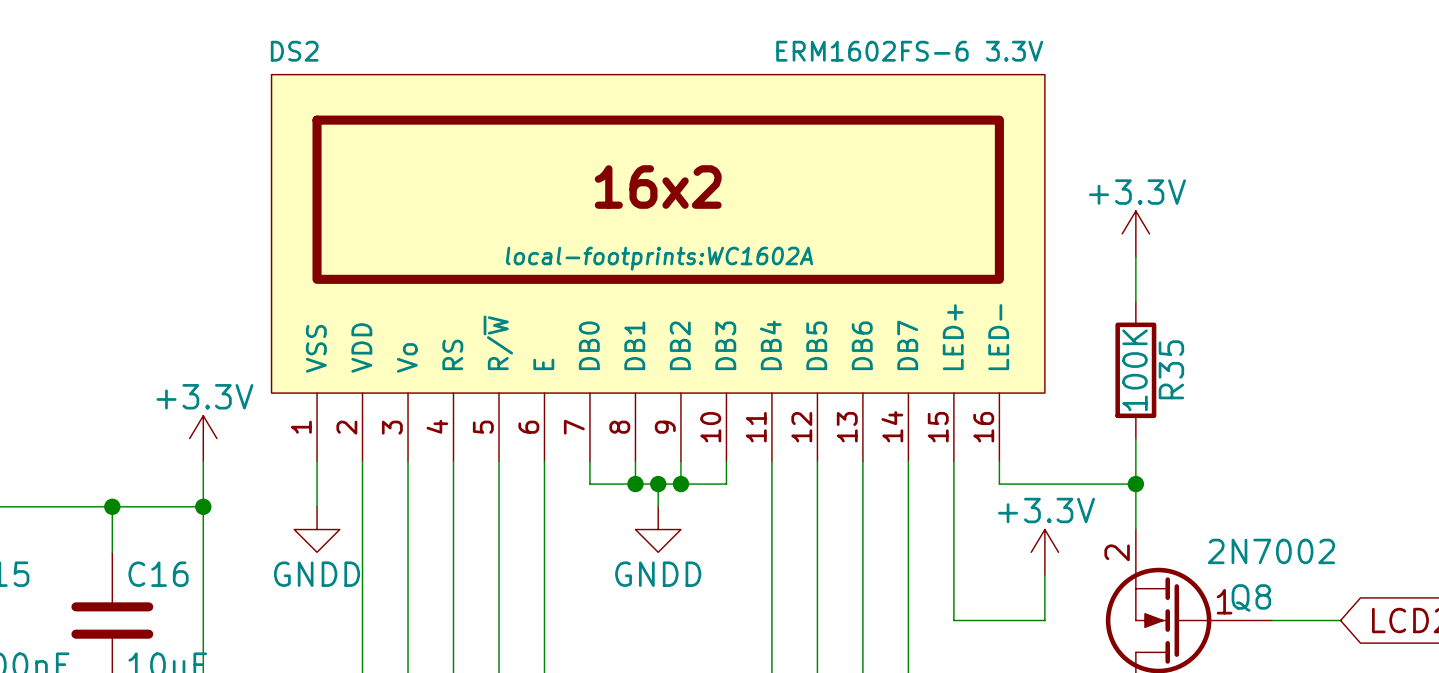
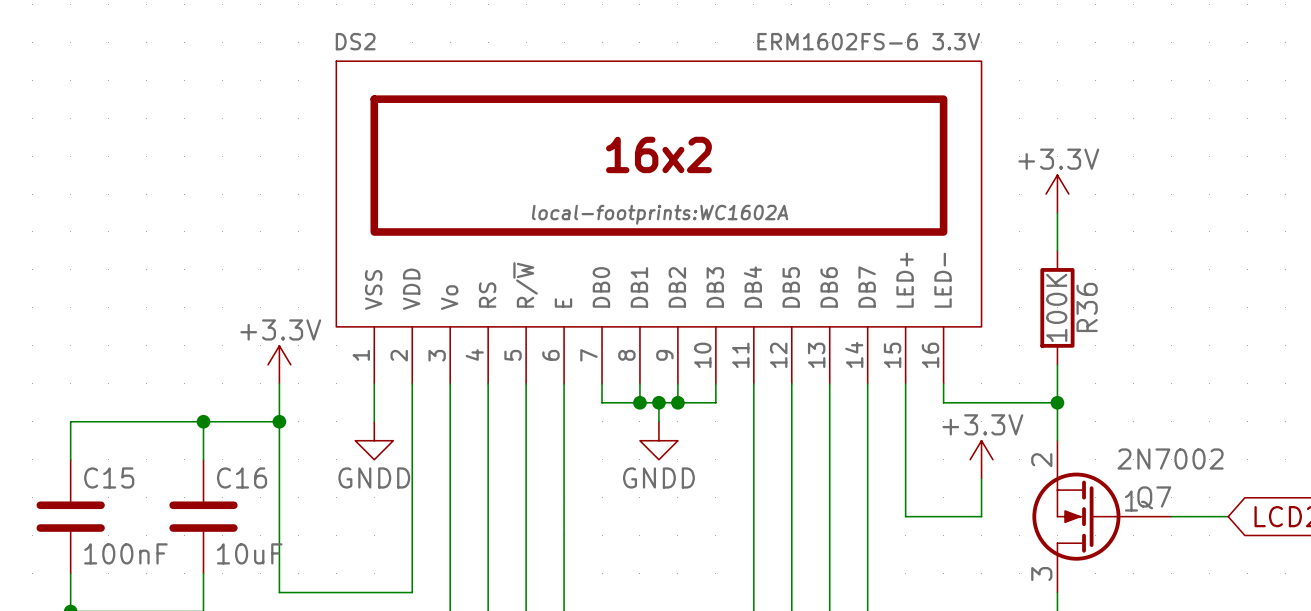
R35 name: R35 (1171, 369) -> R36 (1087, 307)
Q8 name: Q8 (1251, 598) -> Q7 (1154, 497)

